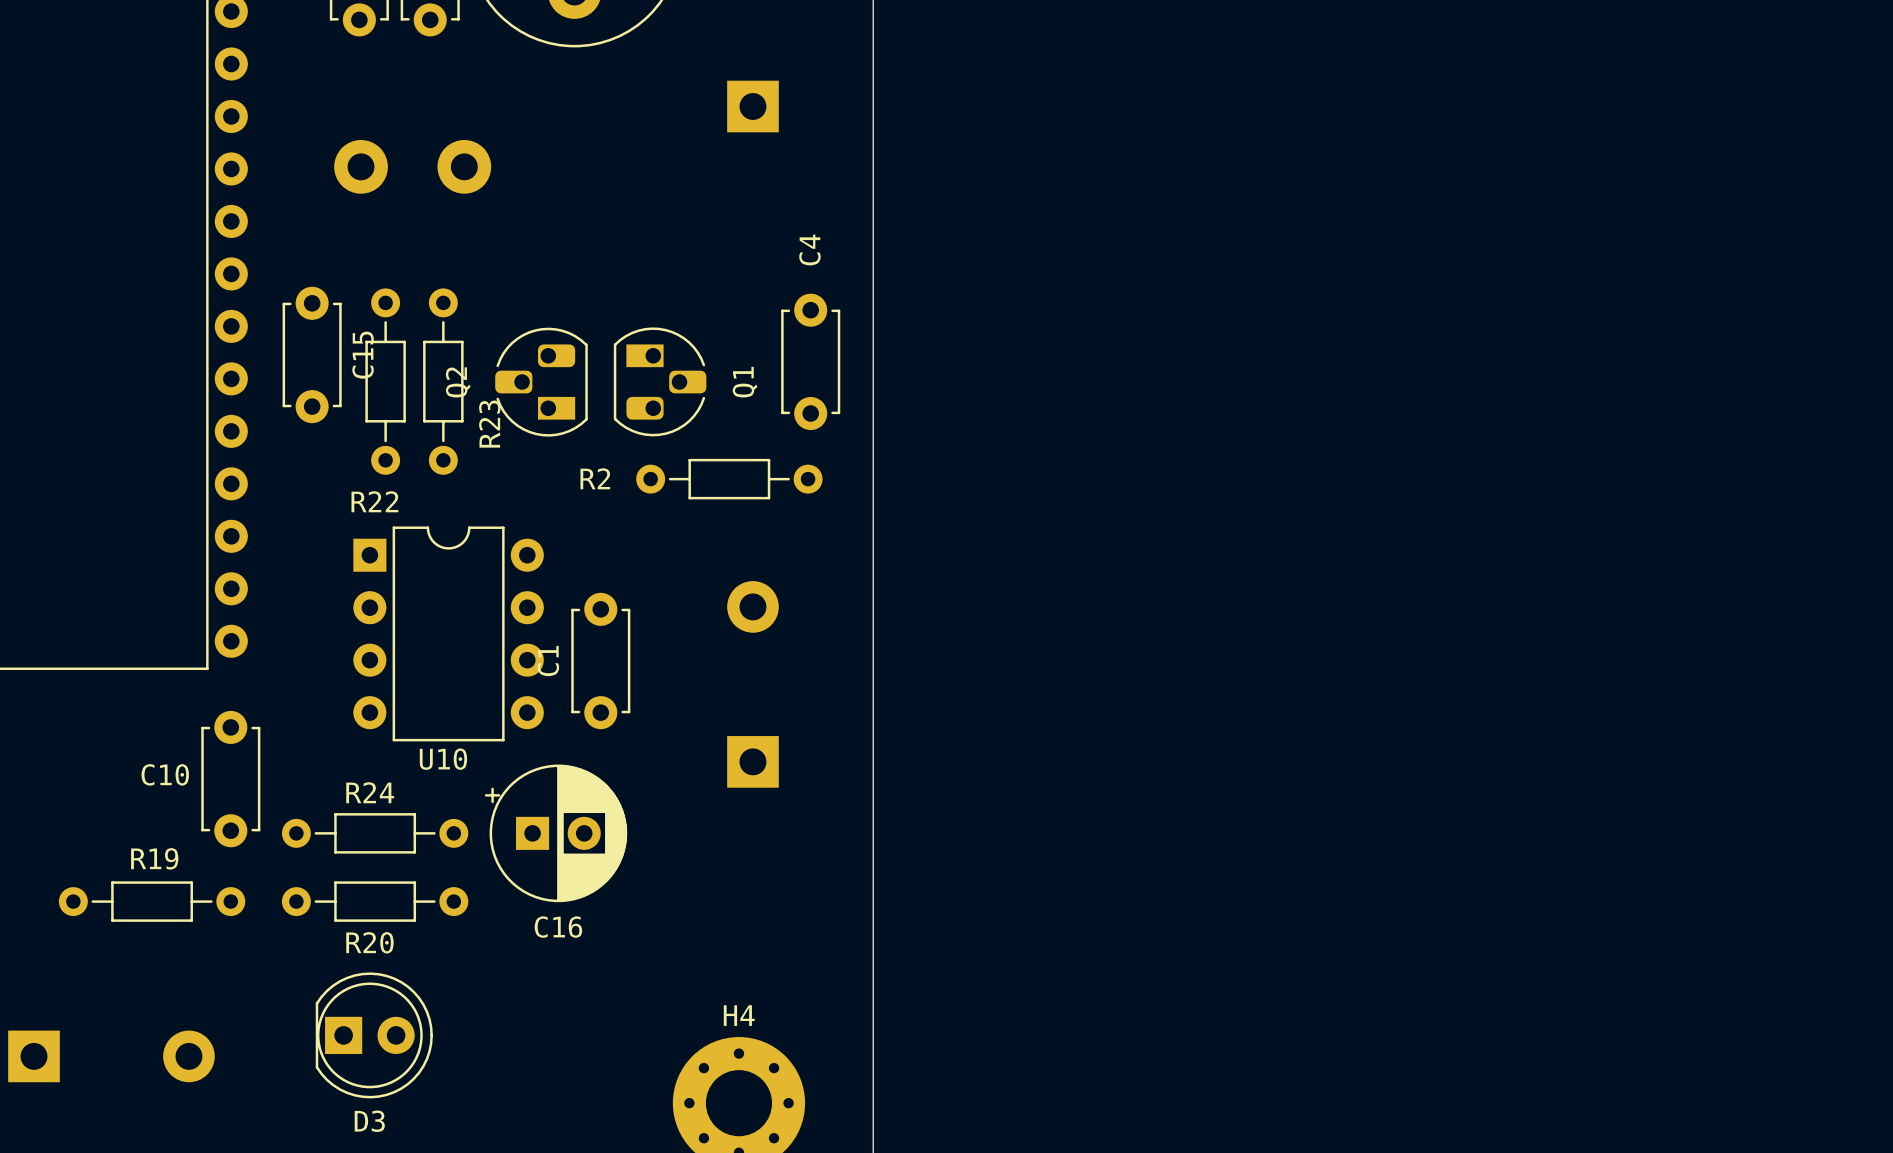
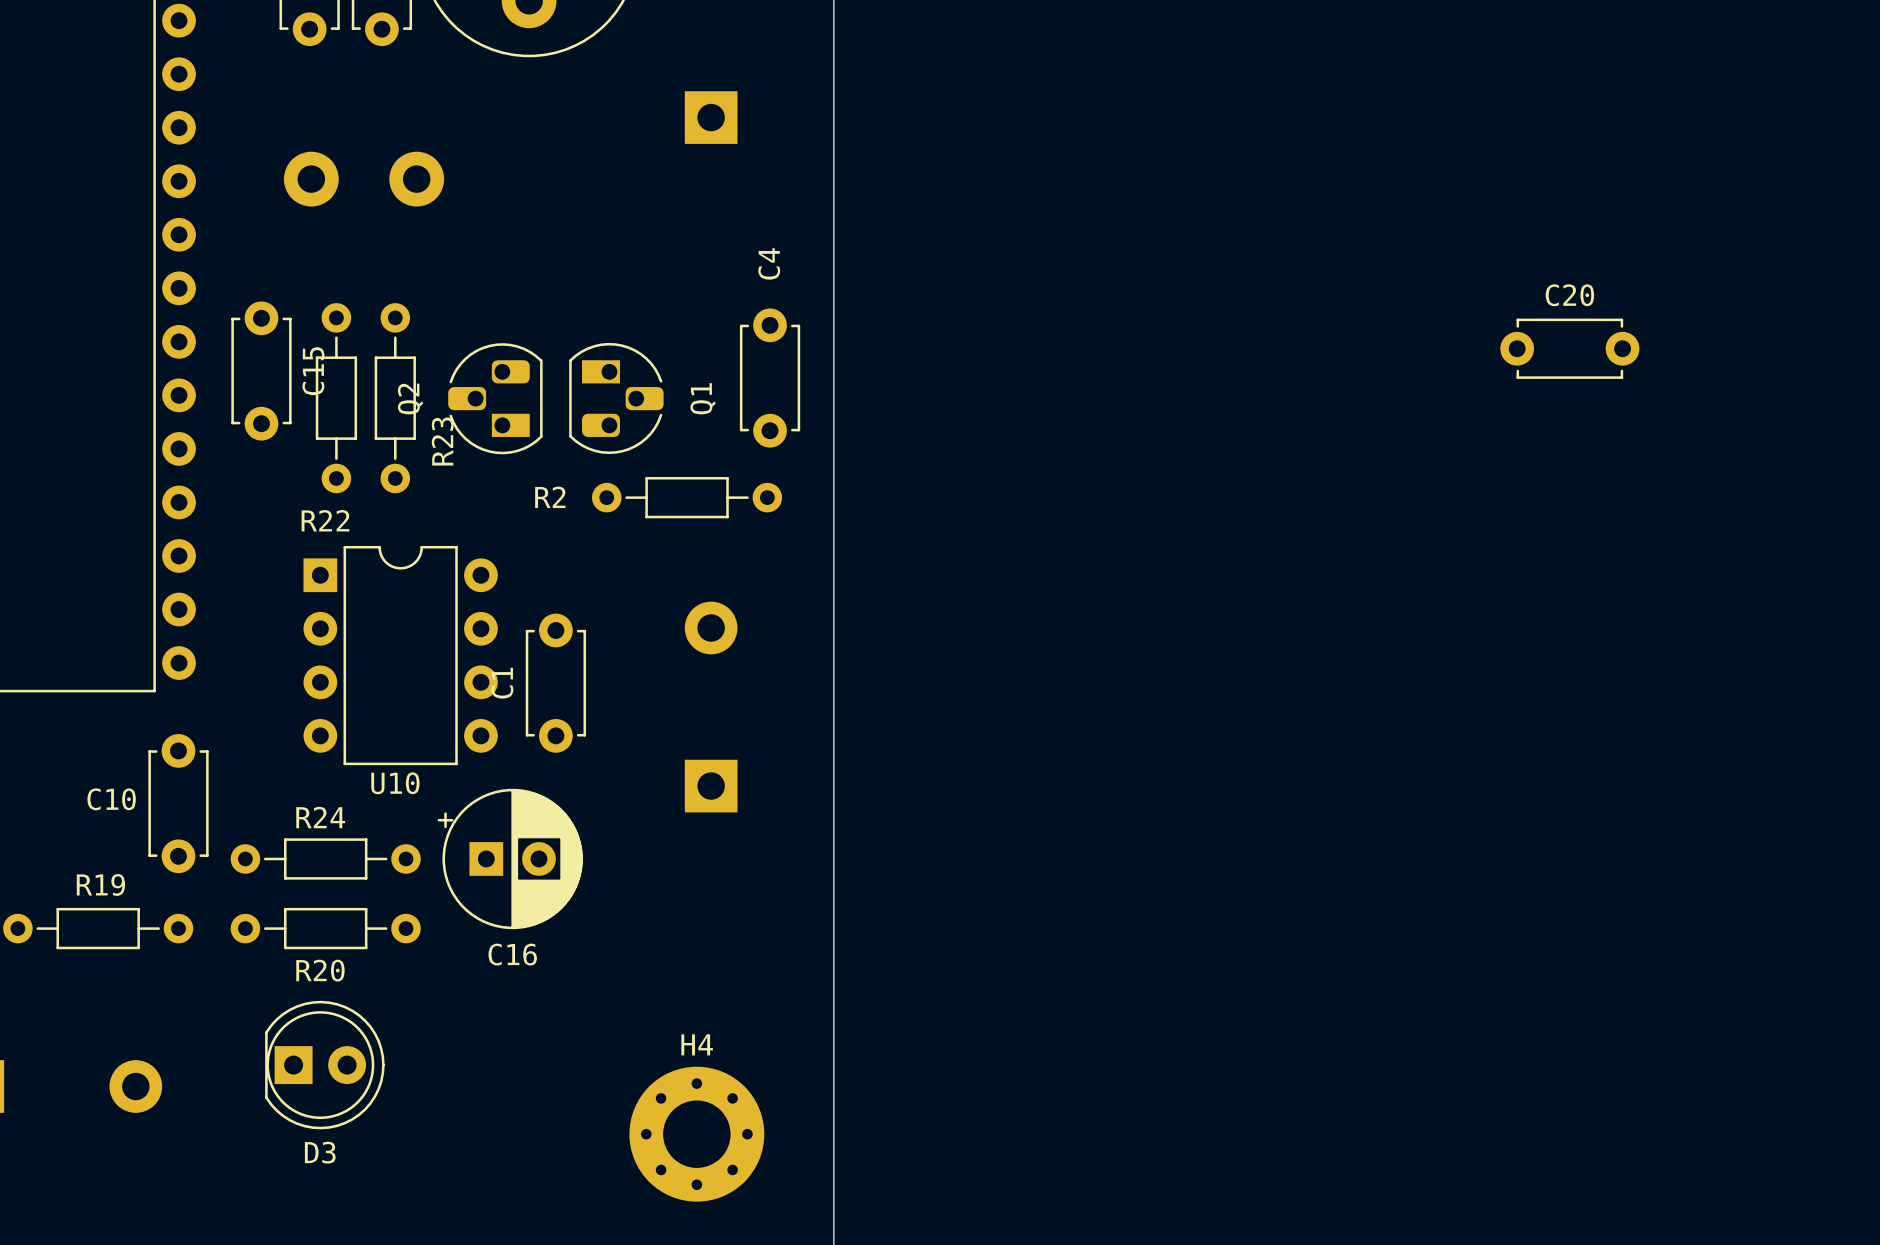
C20: none -> (1569, 348)

